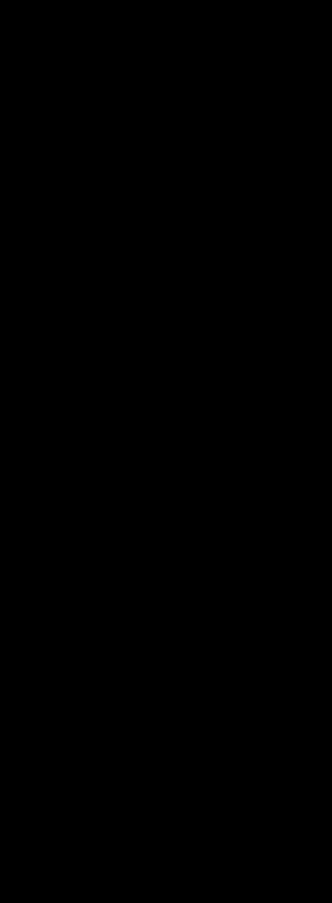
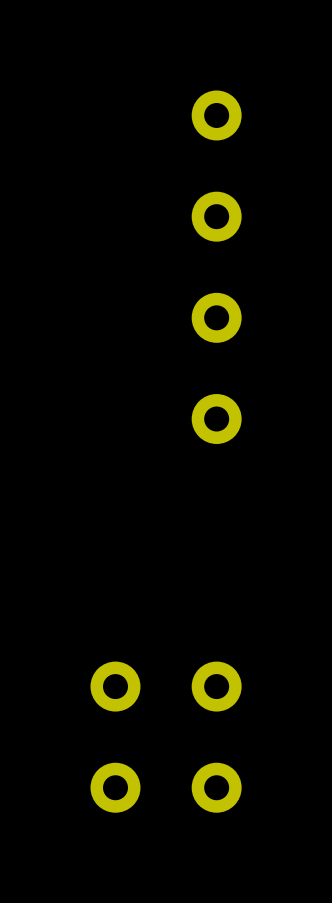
part: none -> (216, 115)
part: none -> (216, 216)
part: none -> (216, 317)
part: none -> (216, 419)
part: none -> (115, 686)
part: none -> (216, 686)
part: none -> (115, 787)
part: none -> (216, 787)

